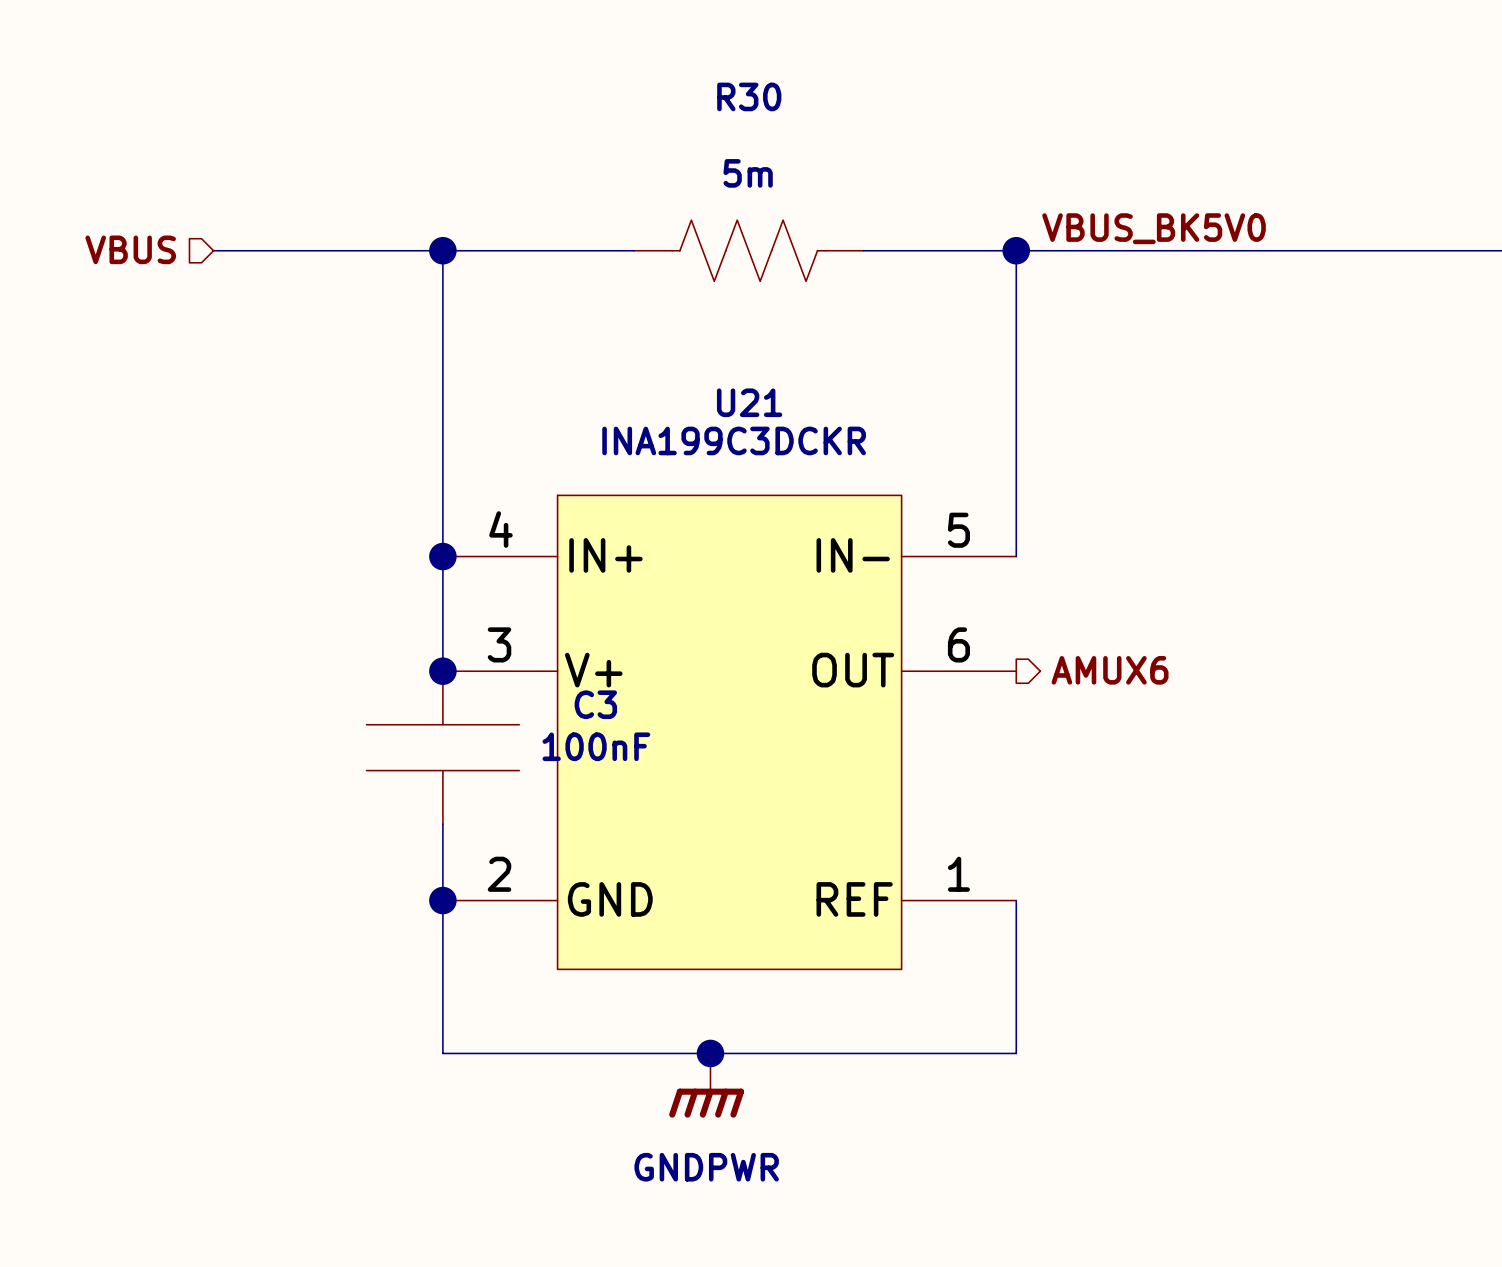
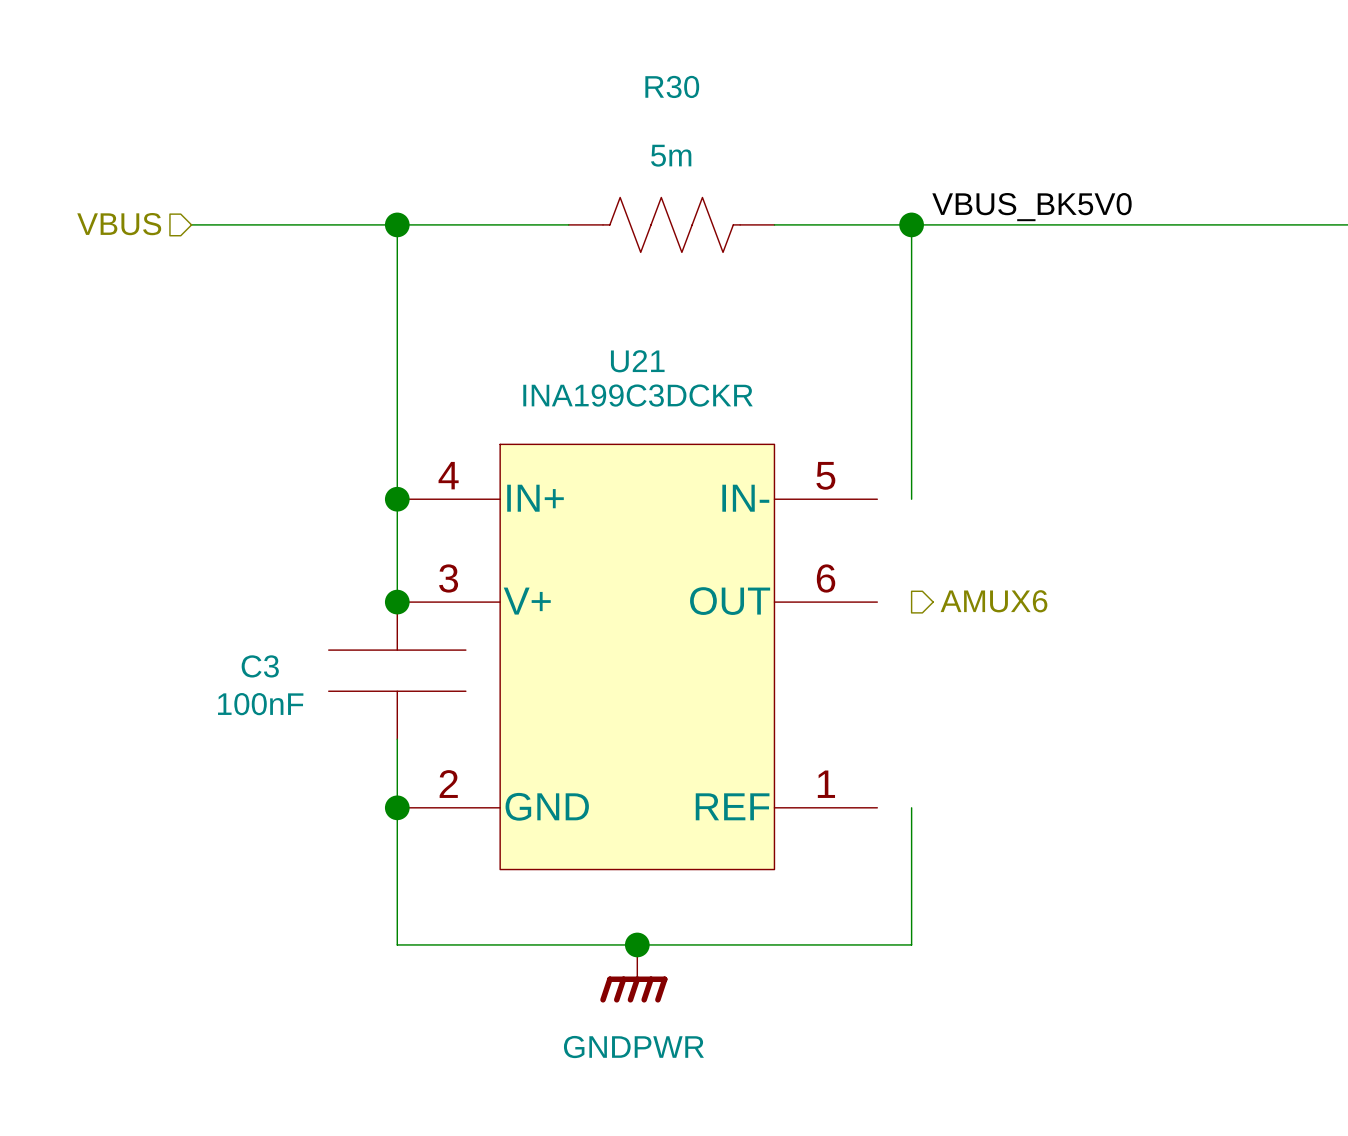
U21 symbol: [442, 495, 1017, 970] -> [397, 444, 878, 870]
C3 name position: C3 (595, 704) -> C3 (260, 666)
C3 value position: 100nF (596, 746) -> 100nF (260, 704)

